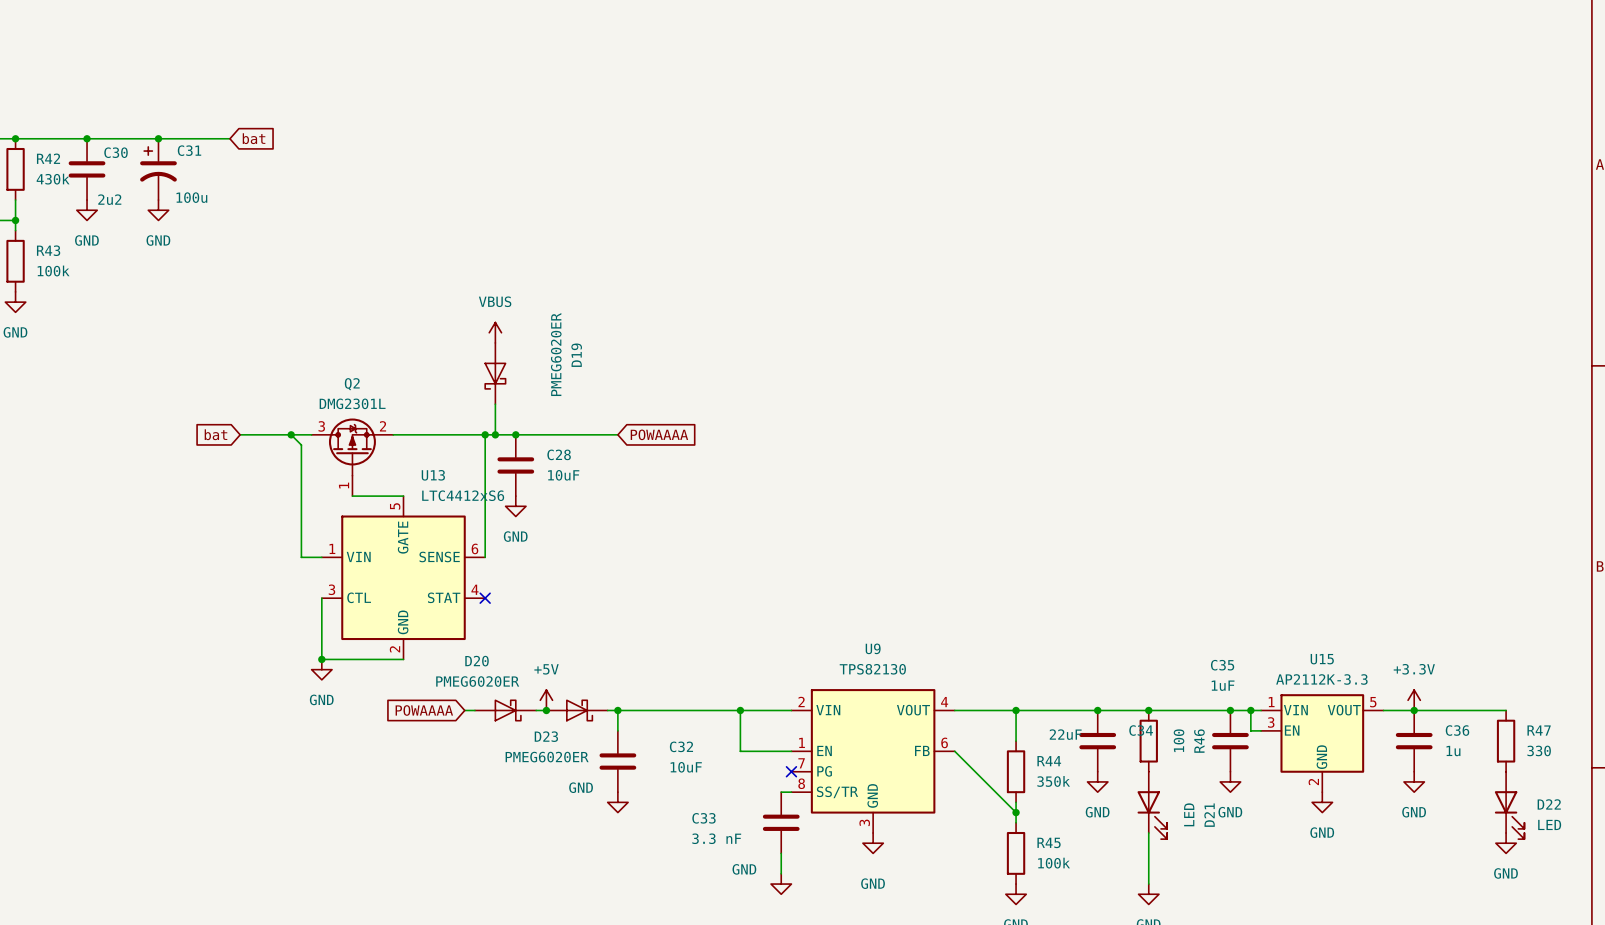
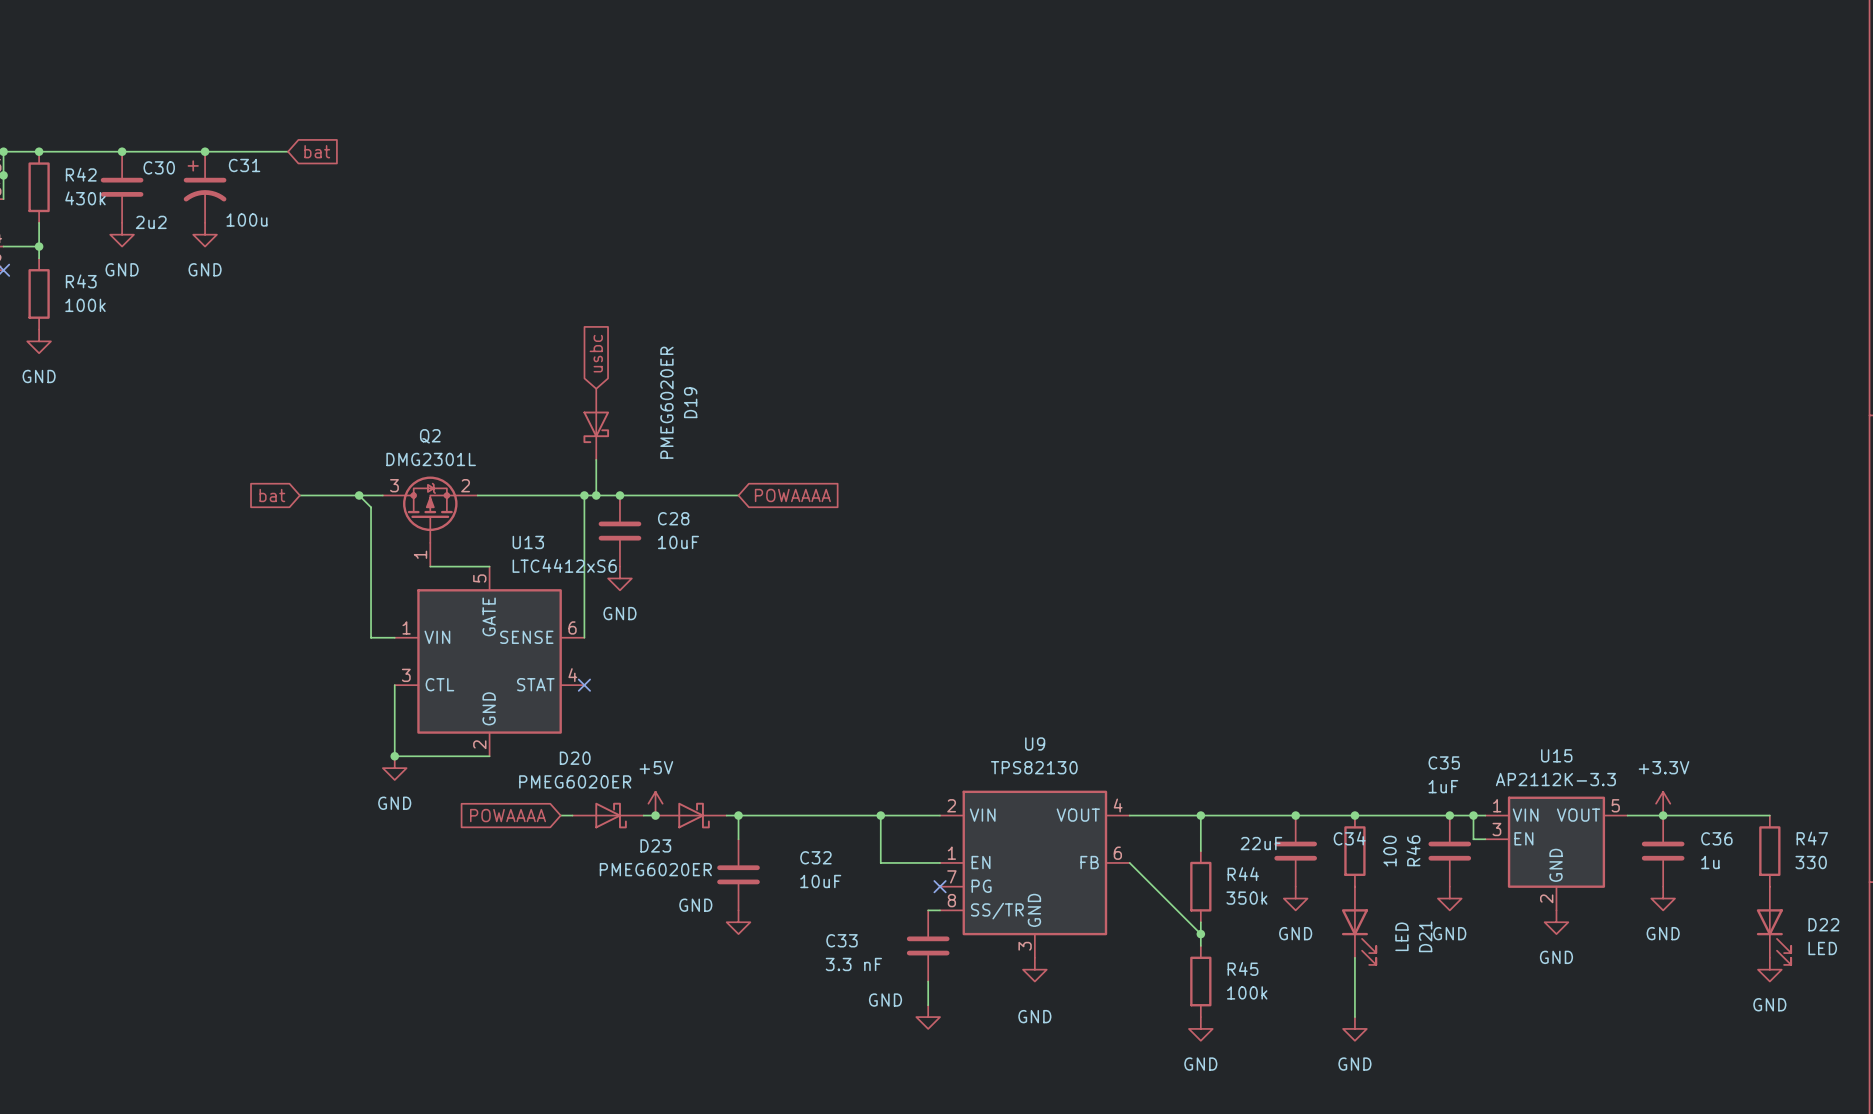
global label: none -> usbc (596, 353)
power symbol: VBUS (495, 332) -> none

